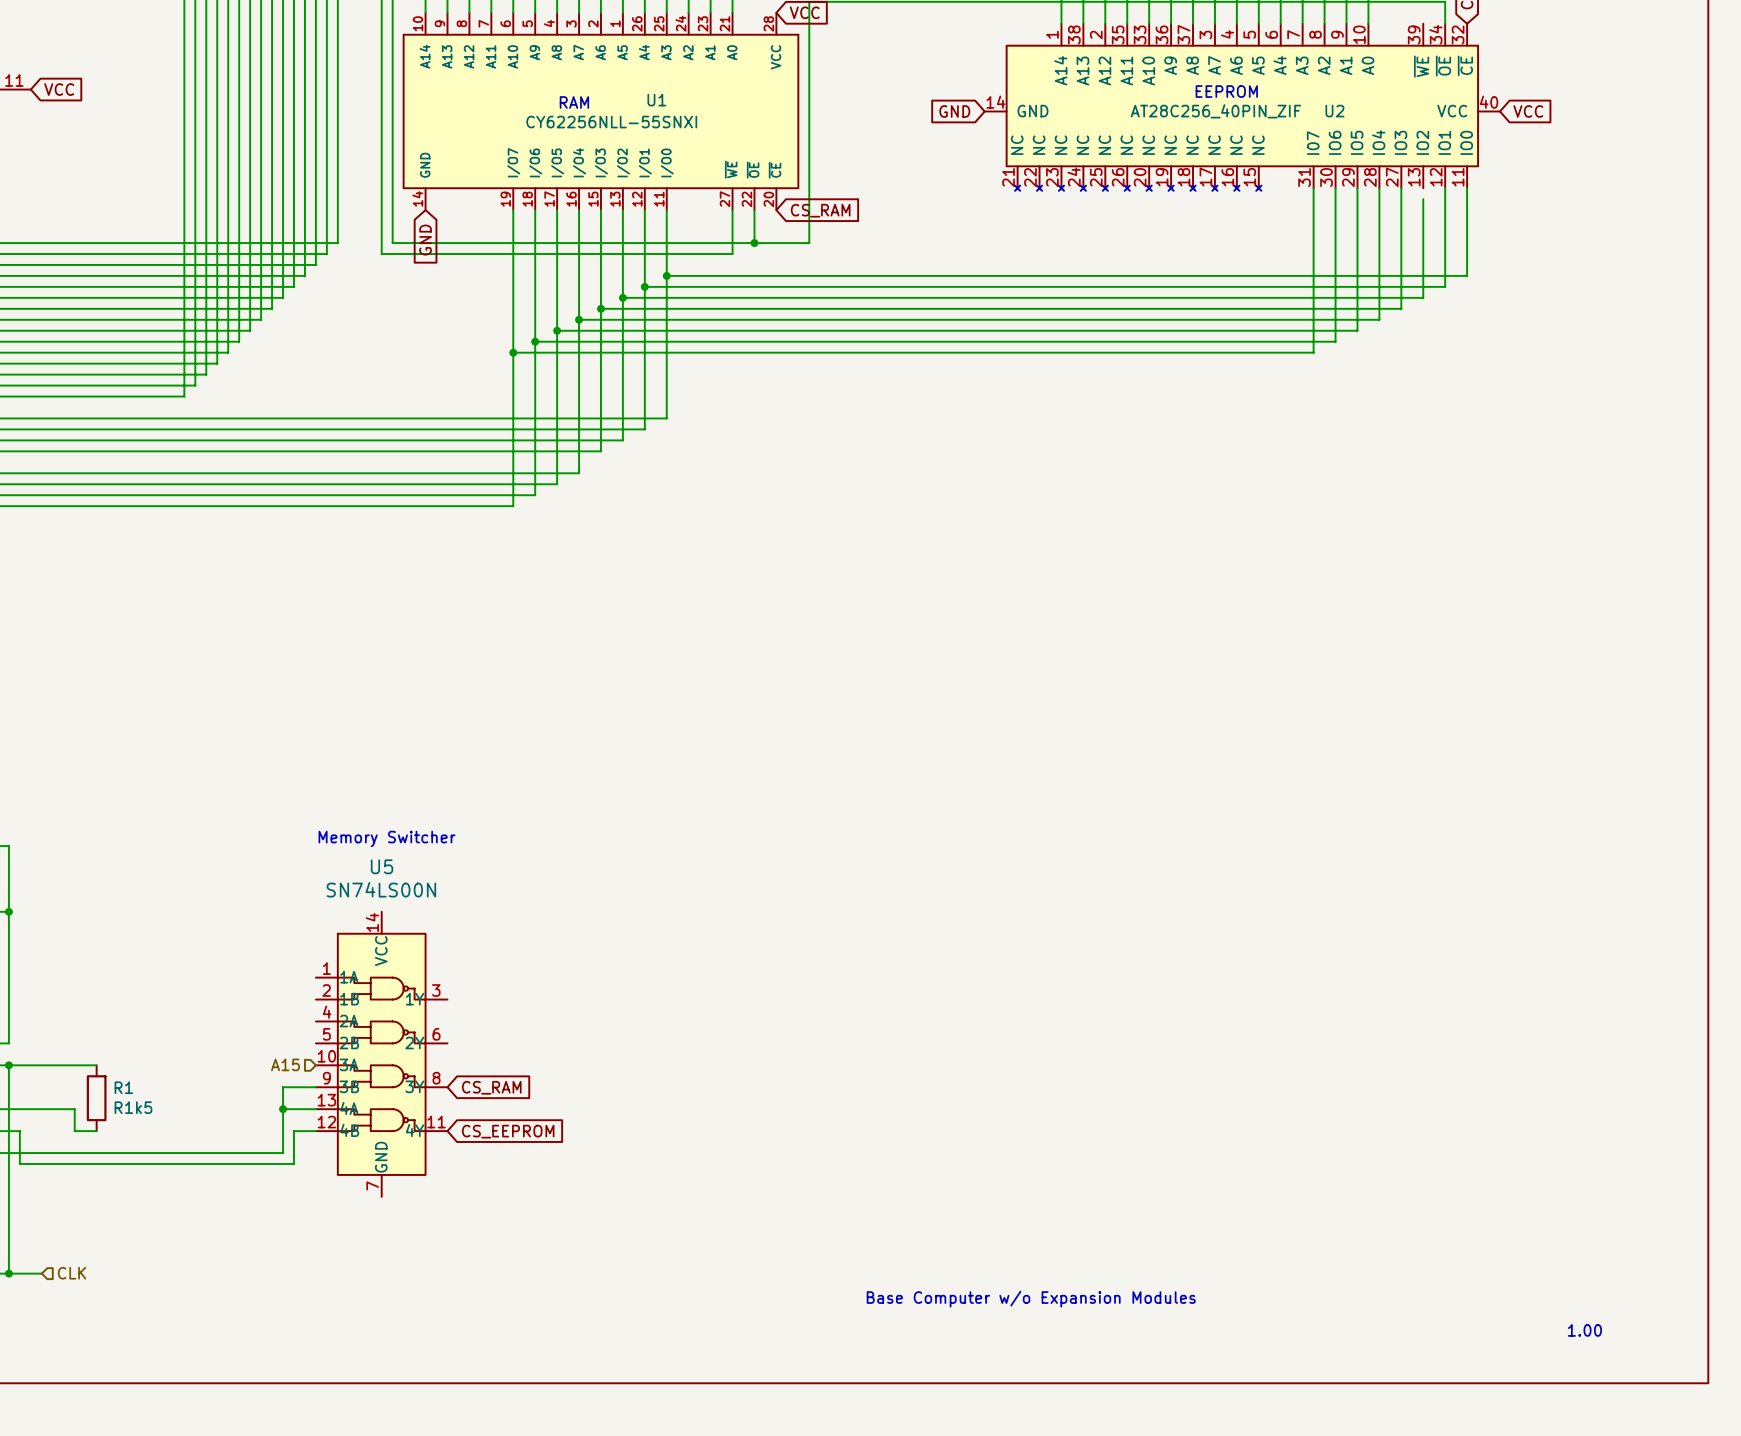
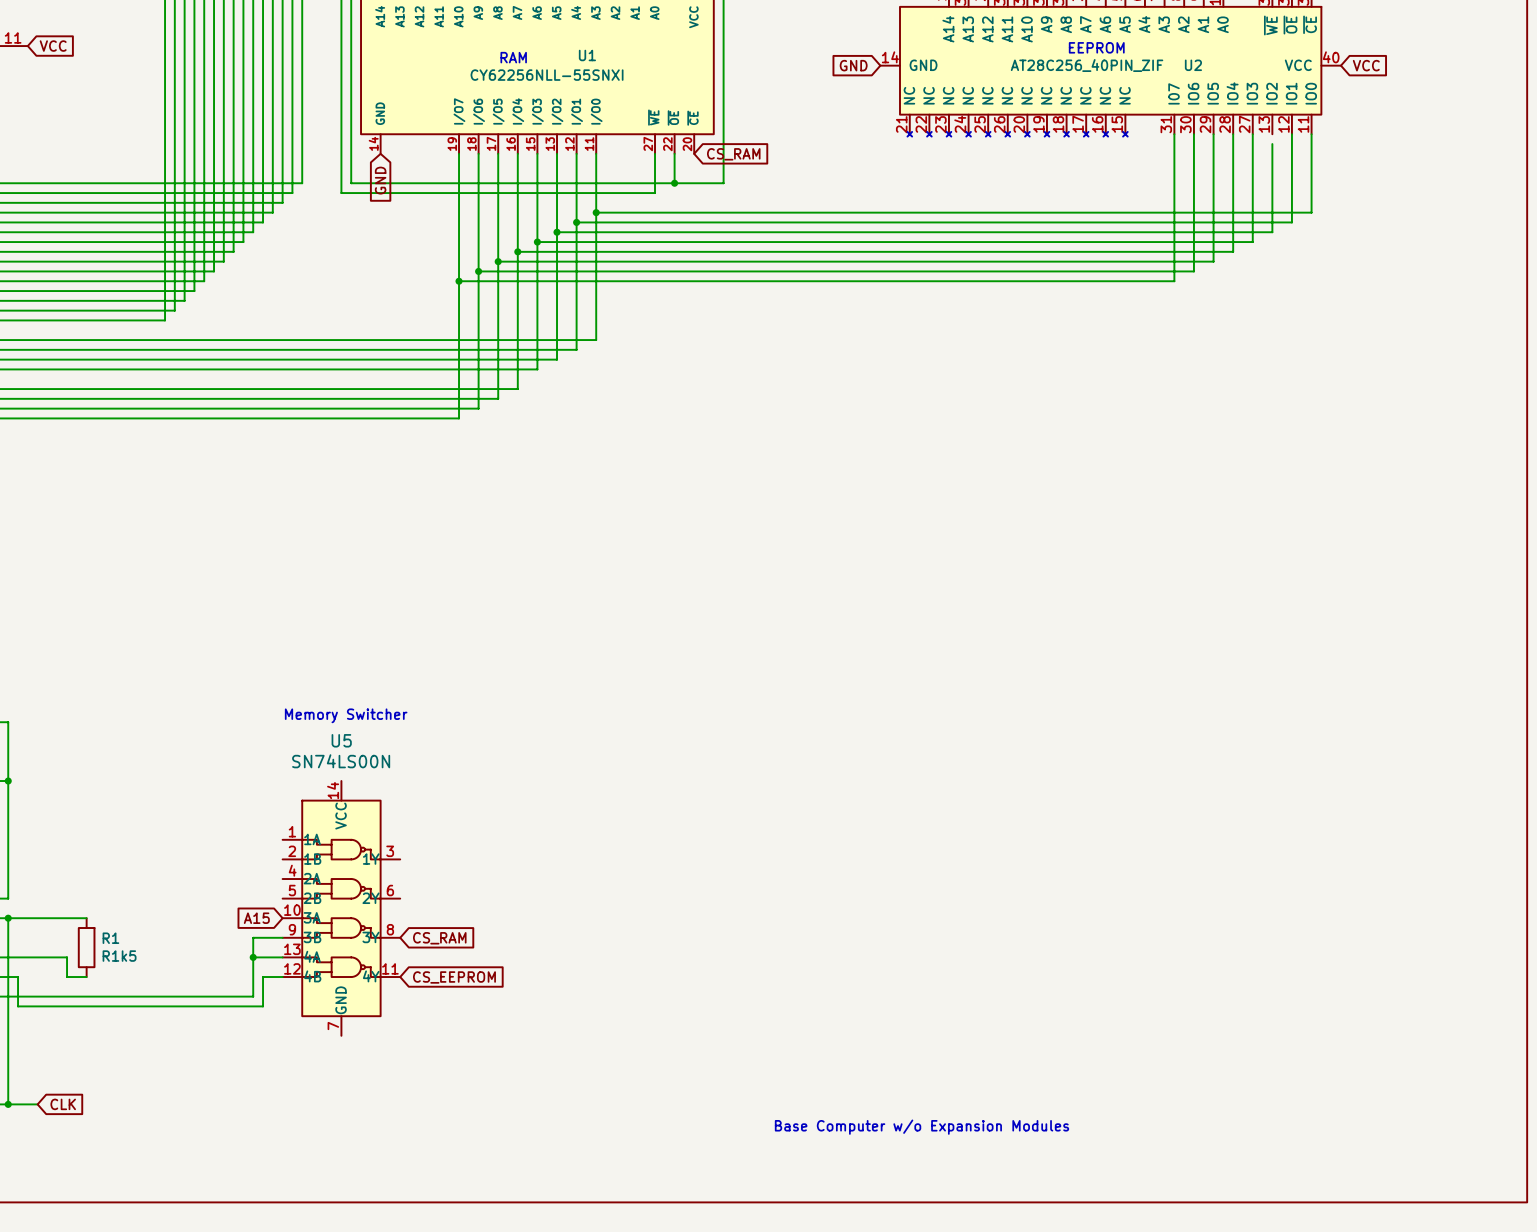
hierarchical label: A15 (285, 1064) -> none
global label: none -> A15 (256, 918)
global label: none -> CLK (63, 1104)
hierarchical label: CLK (72, 1273) -> none
text: 1.00 (1584, 1330) -> none

